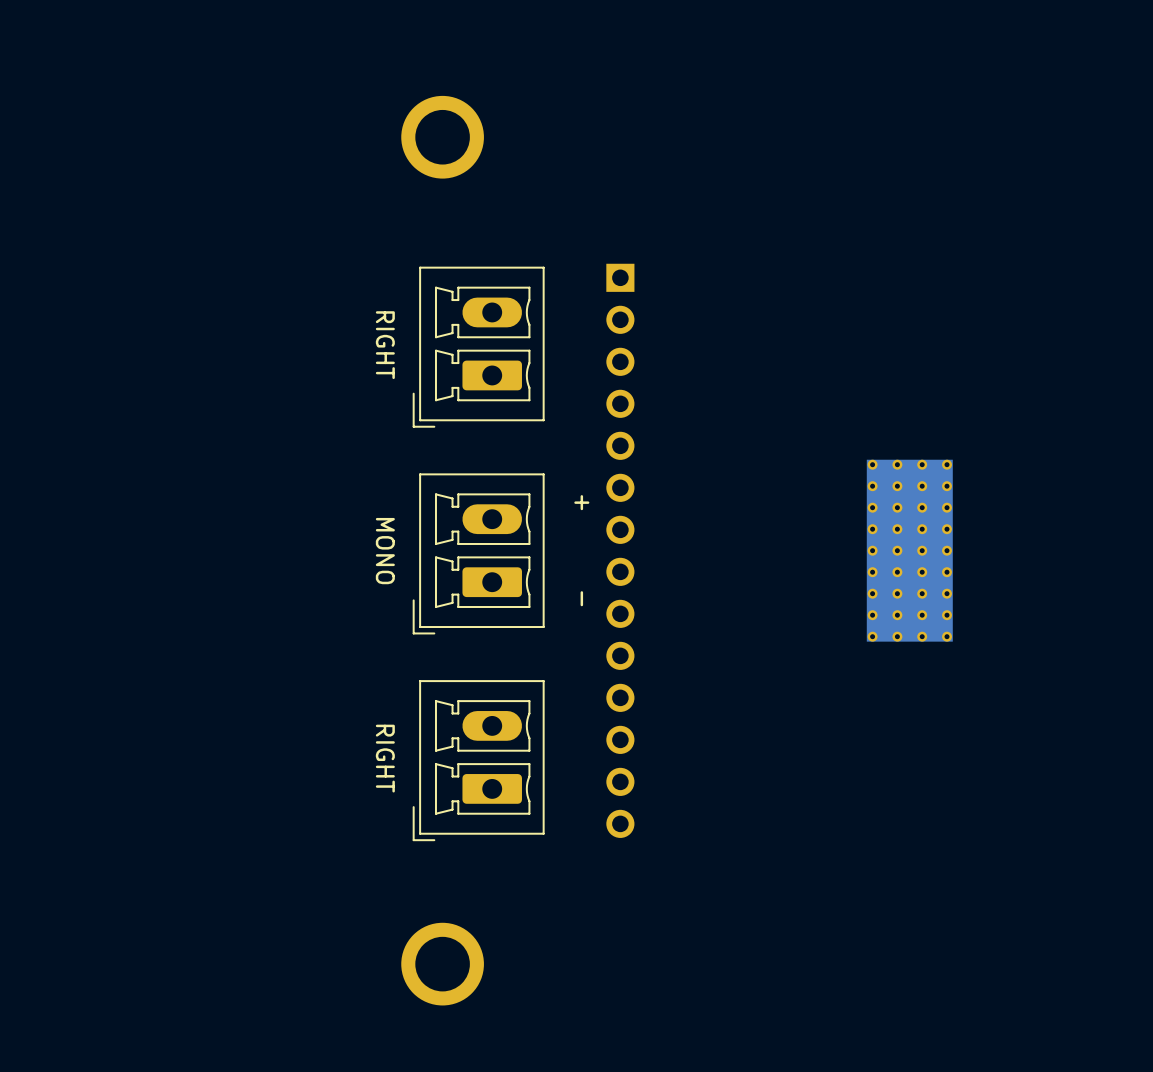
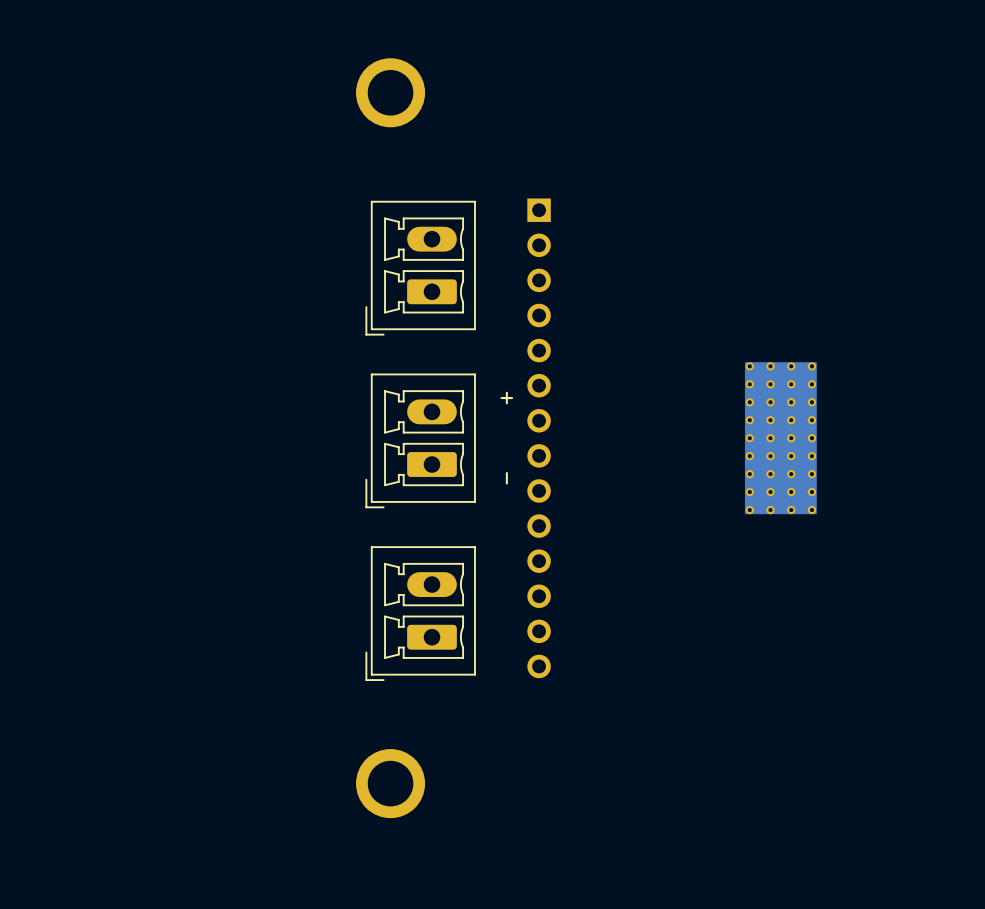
text: RIGHT (385, 345) -> none
text: MONO (385, 551) -> none
text: RIGHT (385, 758) -> none

